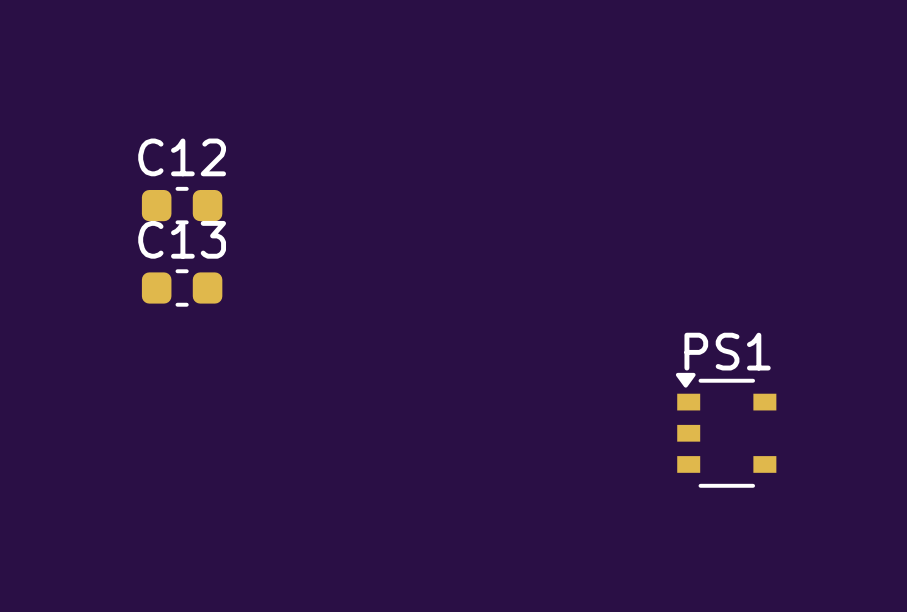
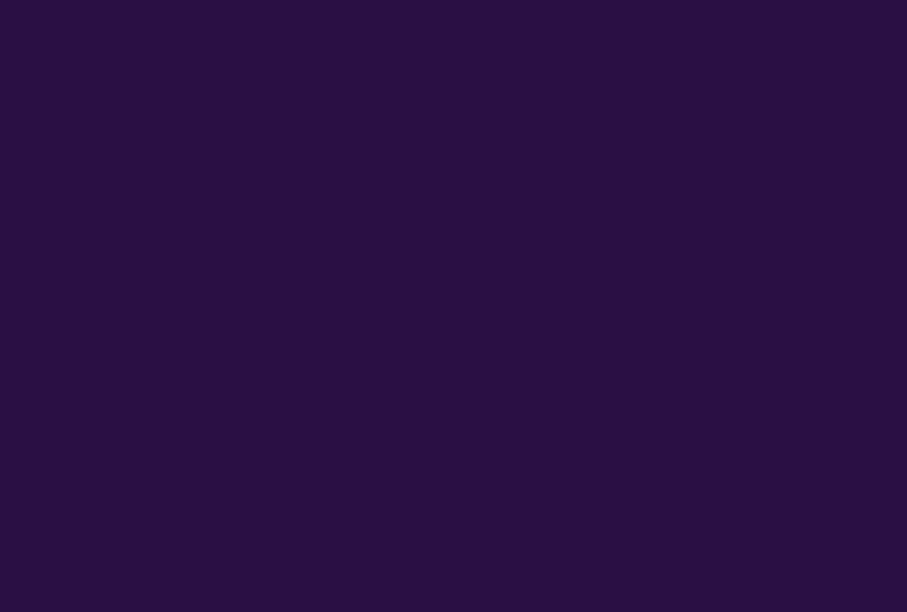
C12: (182, 205) -> none
C13: (182, 288) -> none
PS1: (726, 430) -> none

